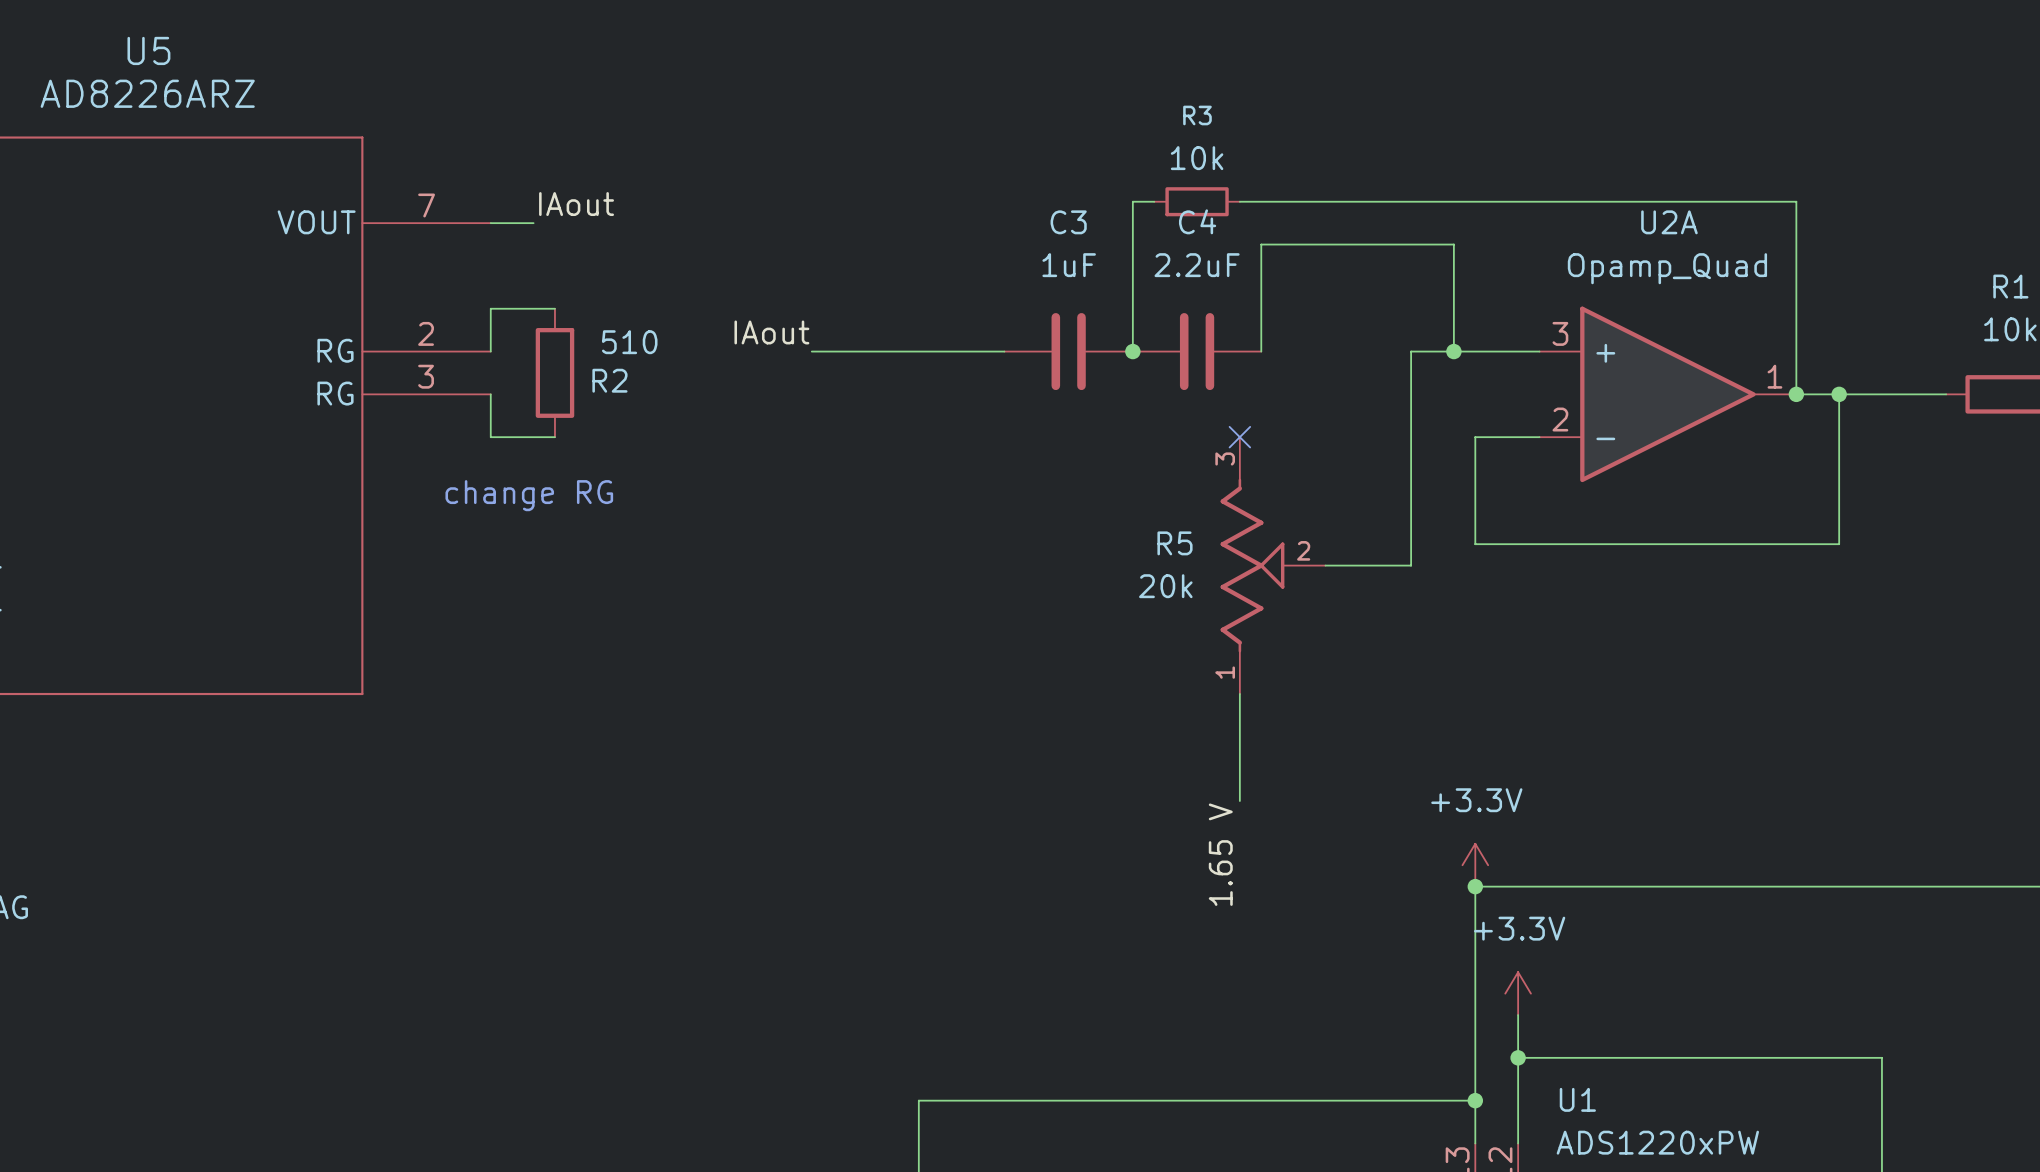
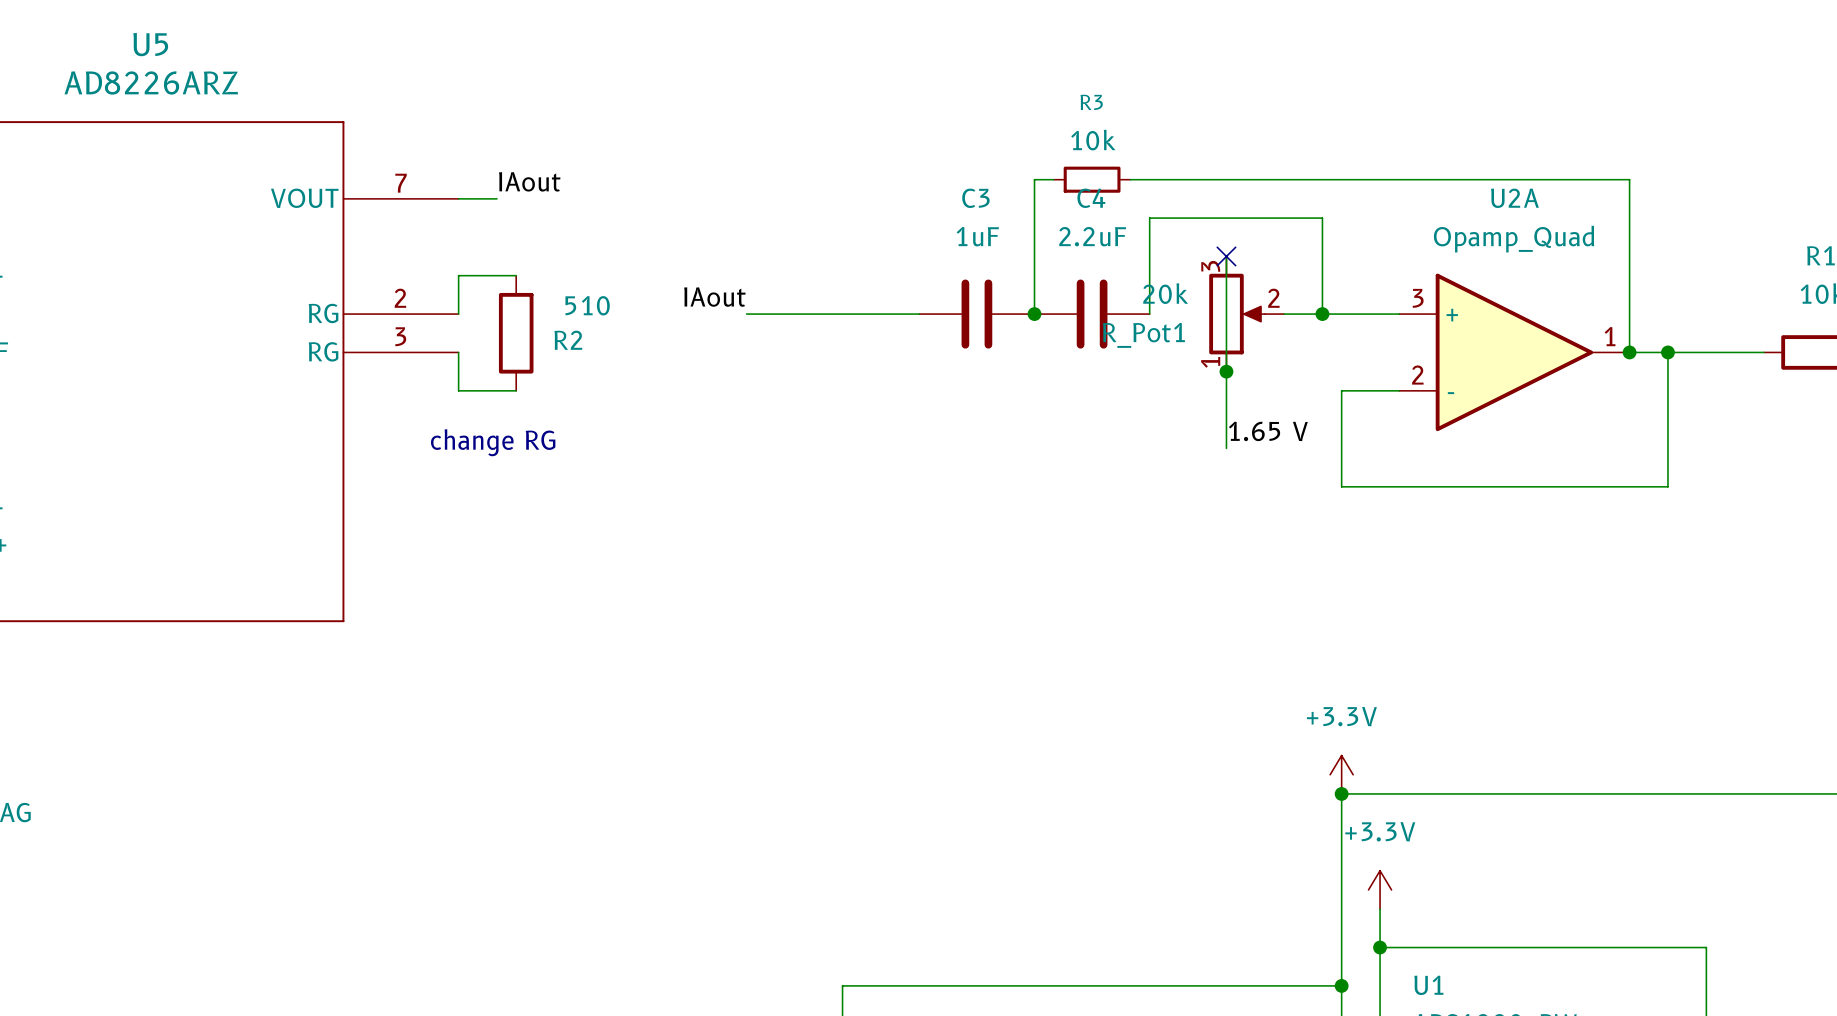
wire: none -> (1226, 256) (1226, 448)
no-connect mark: none -> (1226, 256)
R_Pot1: none -> 20k (1246, 314)
wire: (1411, 351) (1411, 565) (1325, 565) -> none
junction: none -> (1226, 371)
no-connect mark: (1239, 437) -> none
R5: 20k (1273, 565) -> none
wire: (1239, 694) (1239, 801) -> none
label rotation: 0° (1220, 854) -> 90° clockwise (1268, 431)
label position: 1.65 V (1220, 854) -> 1.65 V (1268, 431)

